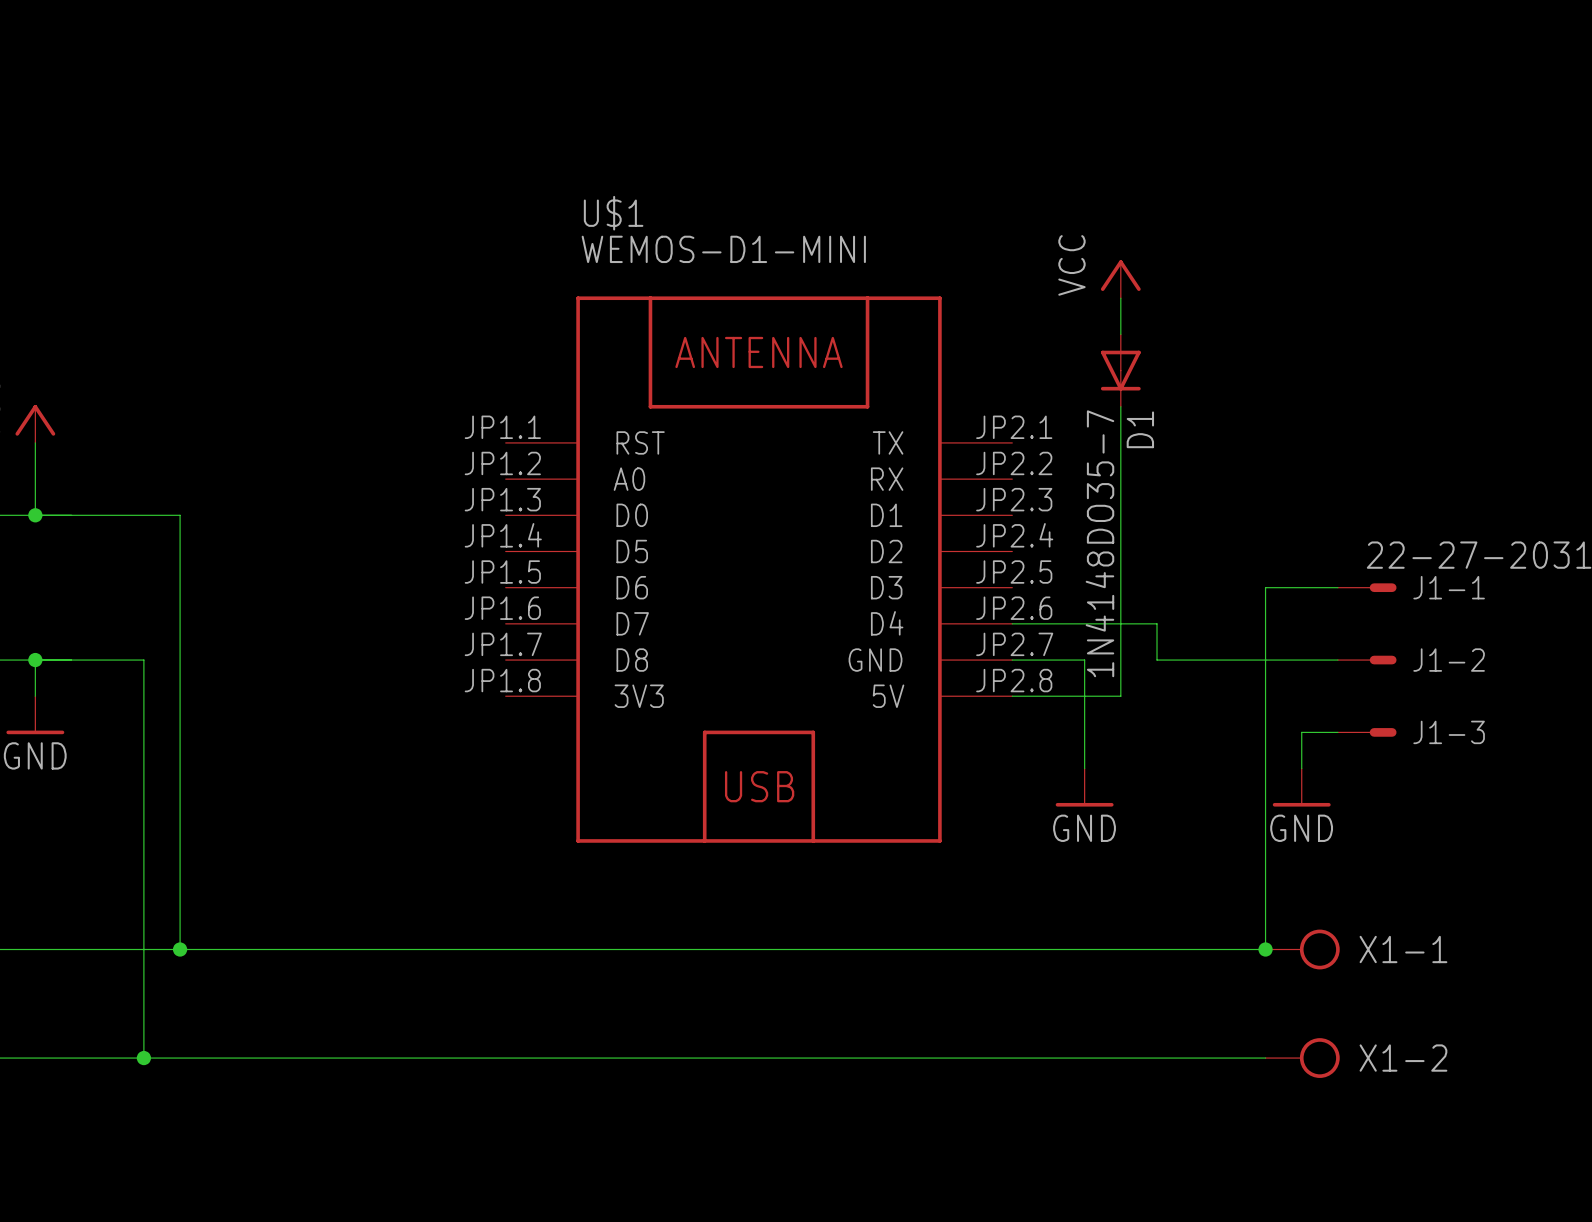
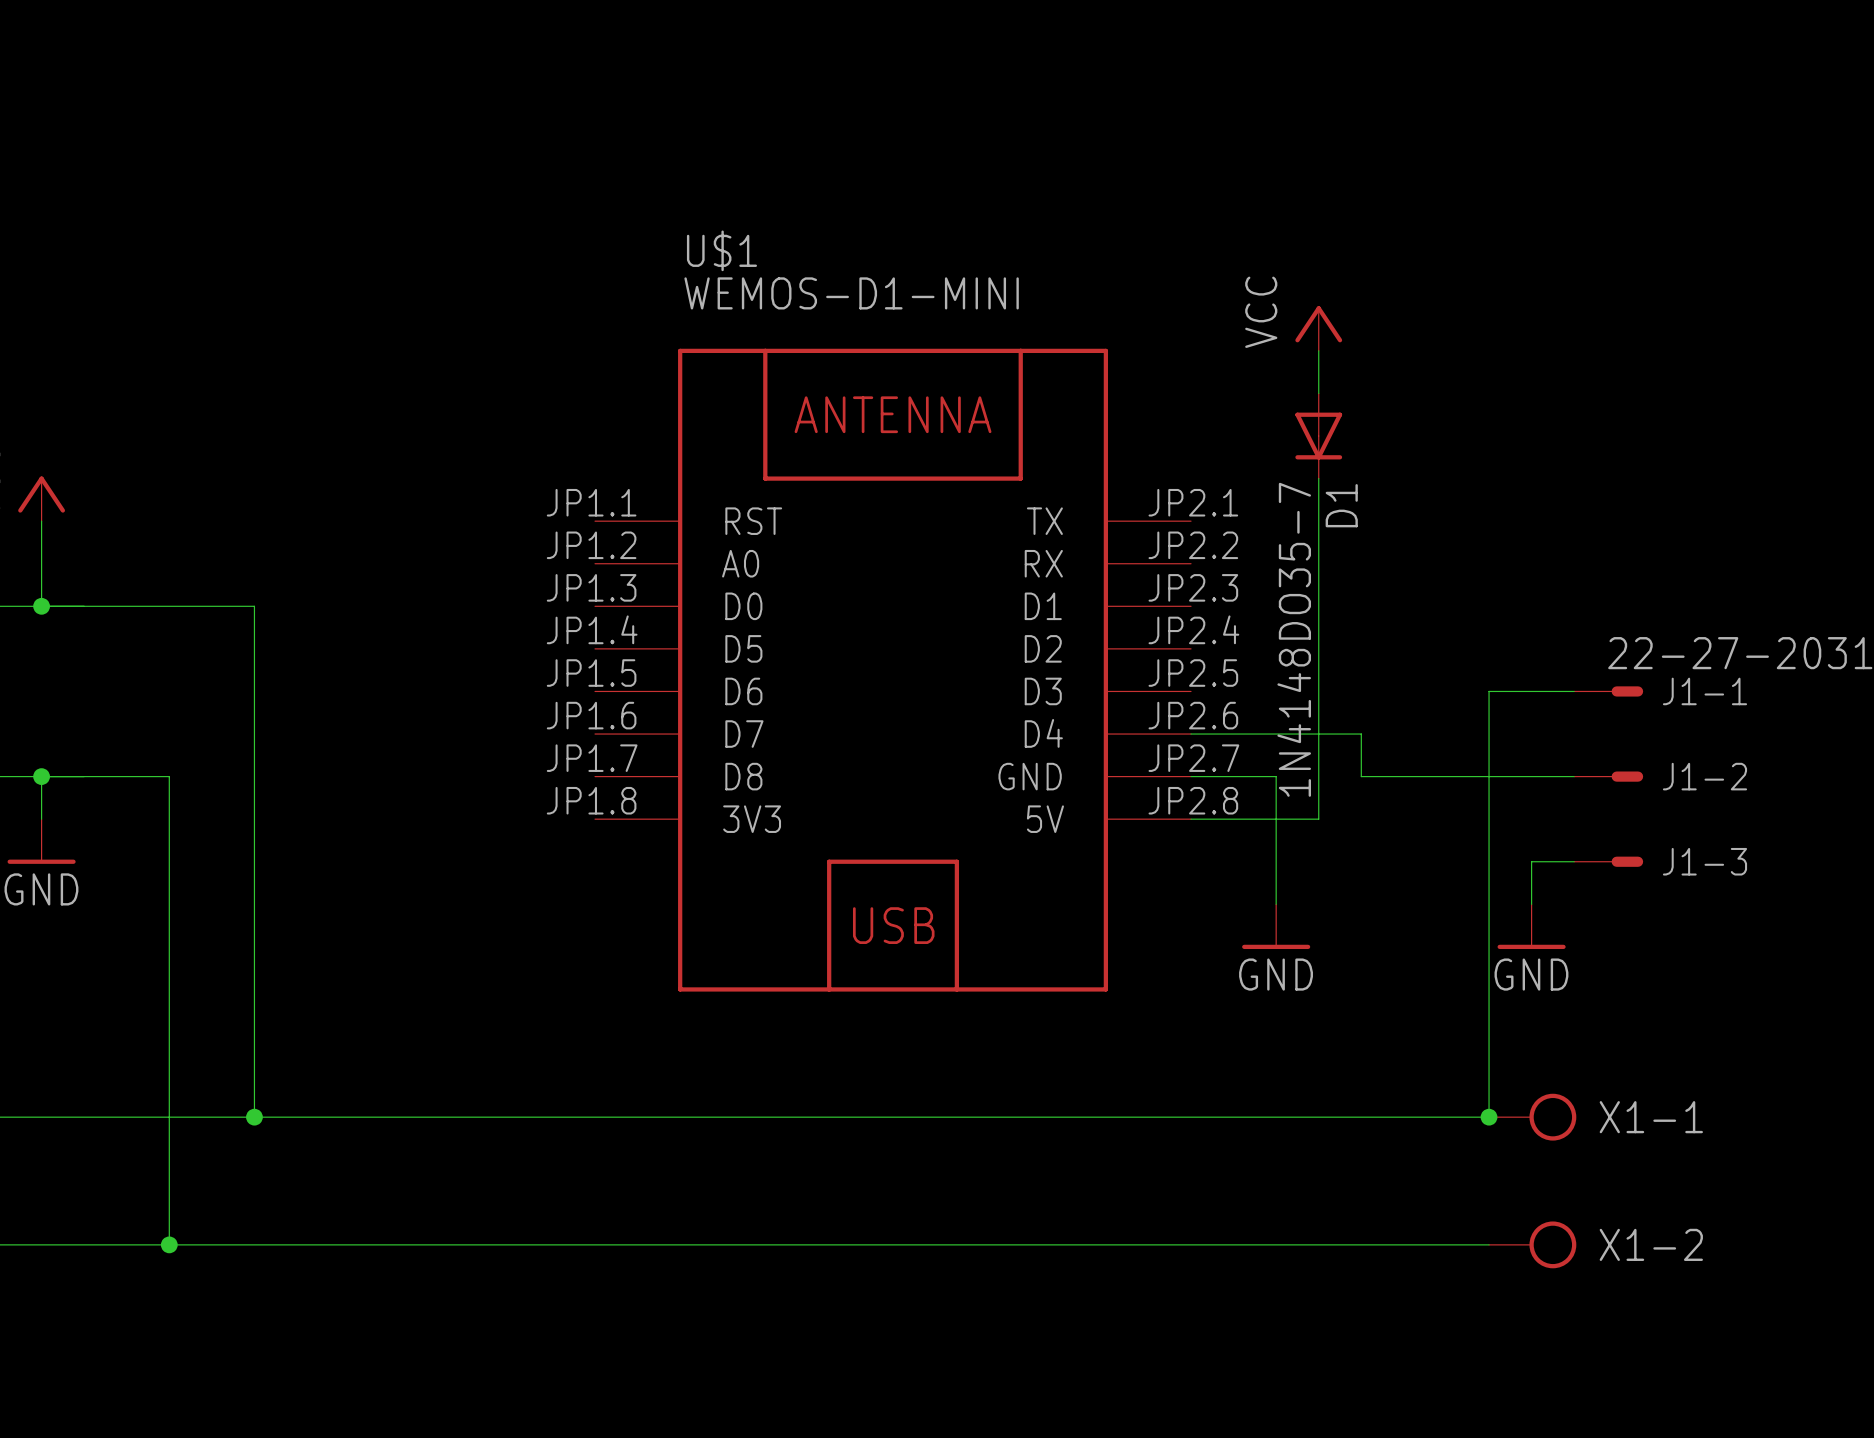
wire: (180, 515) (180, 949) -> (211, 606) (254, 606) (254, 1117)
junction position: (180, 949) -> (254, 1117)

